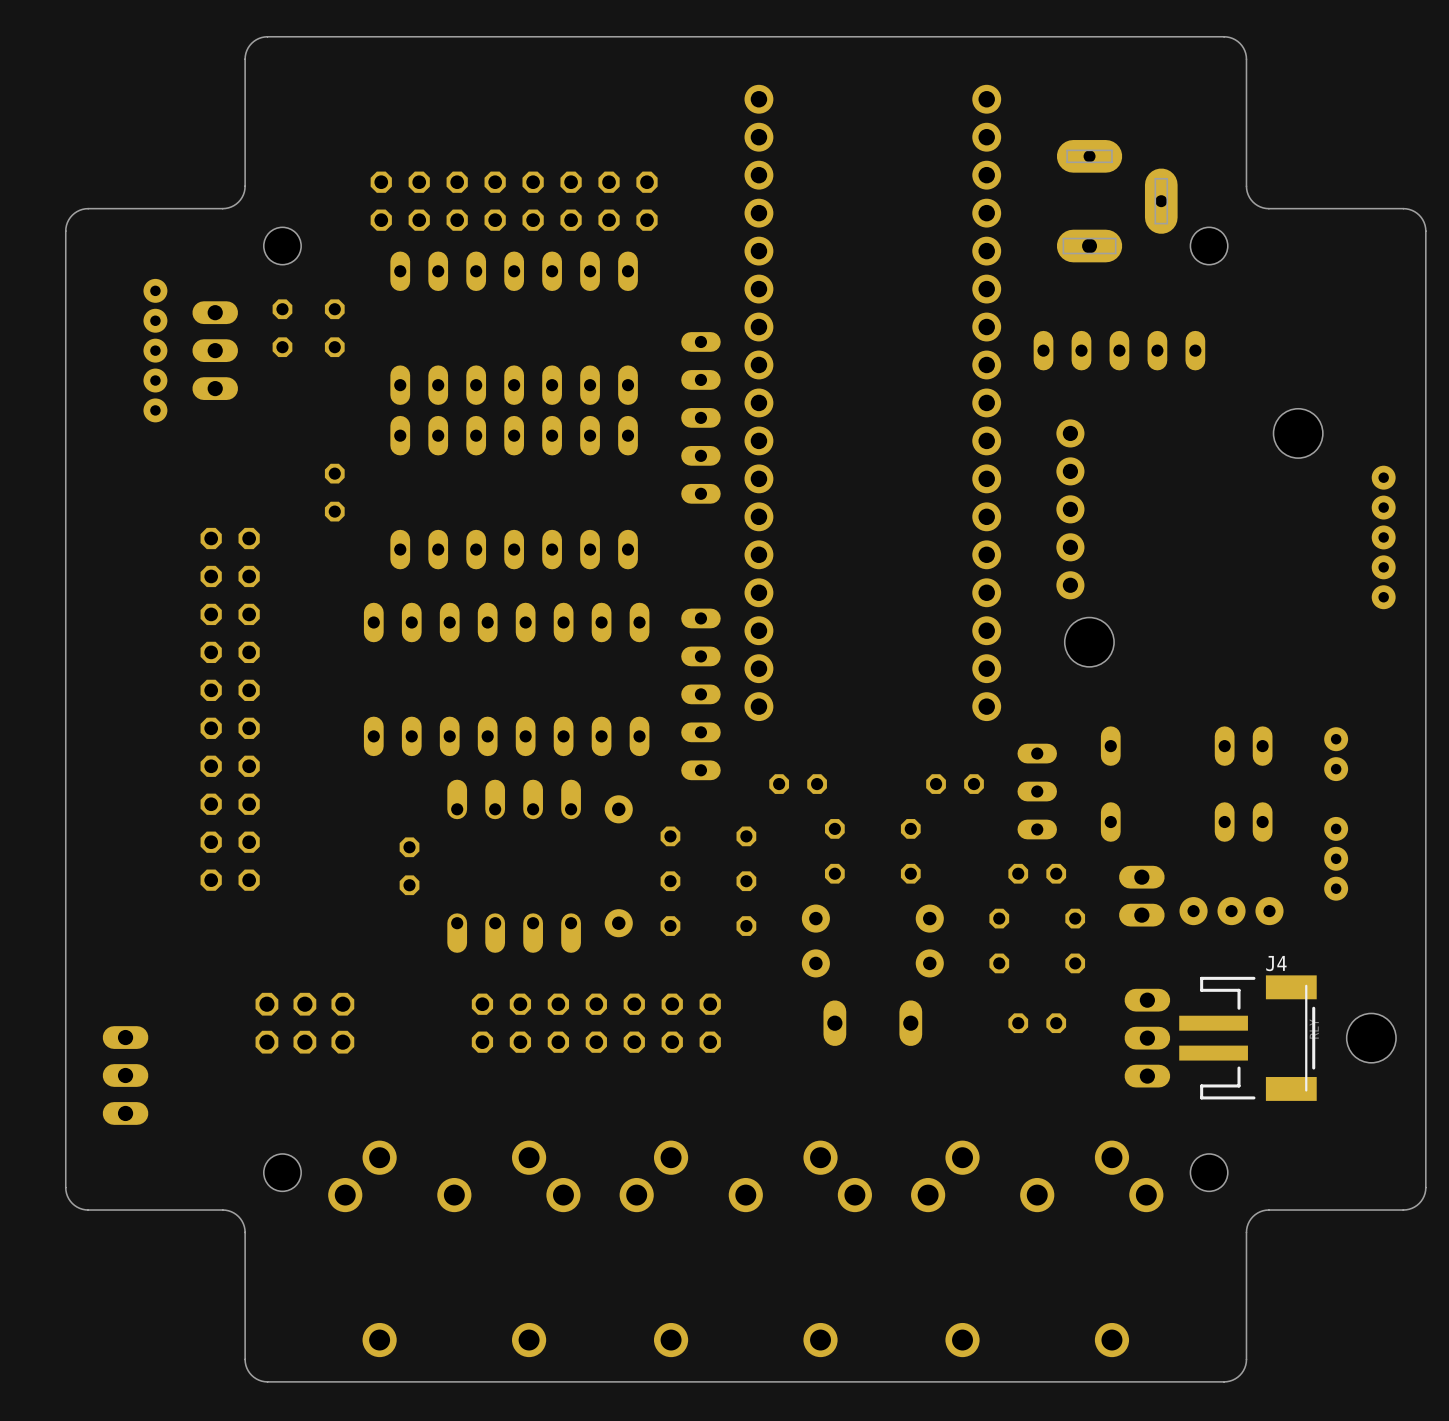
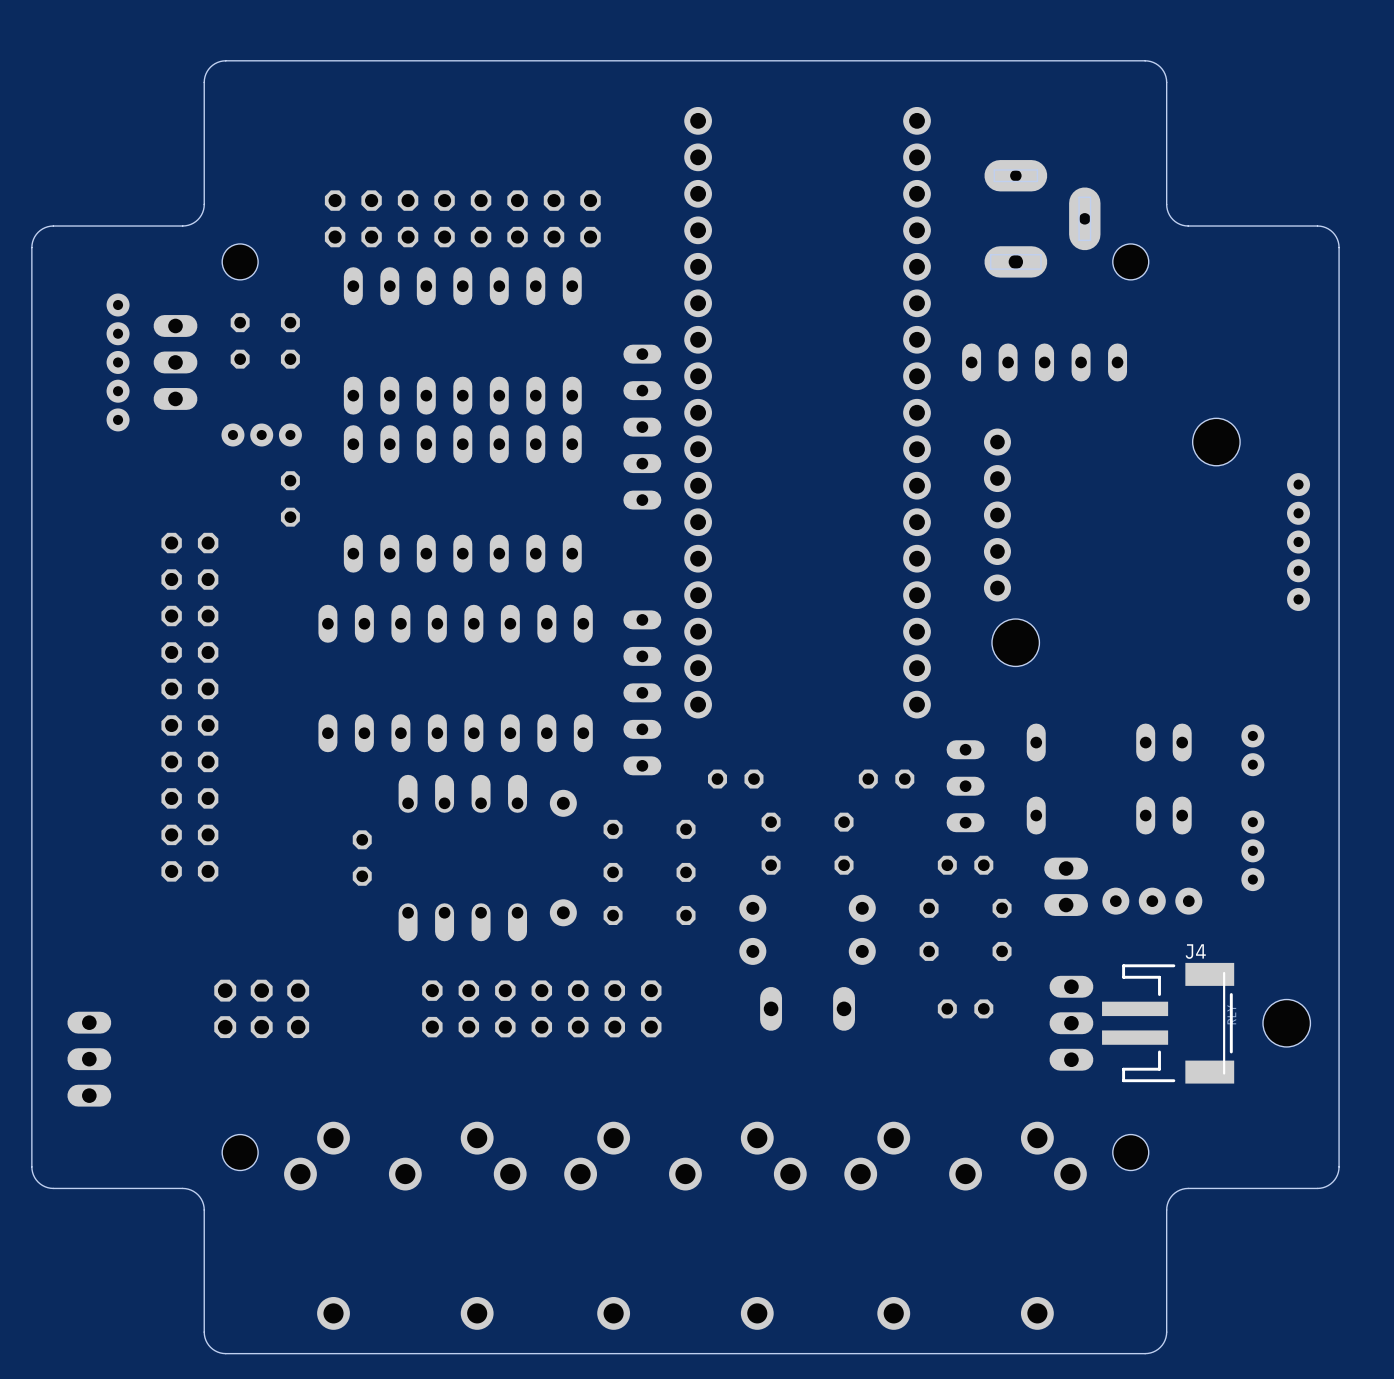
part: none -> (261, 435)

